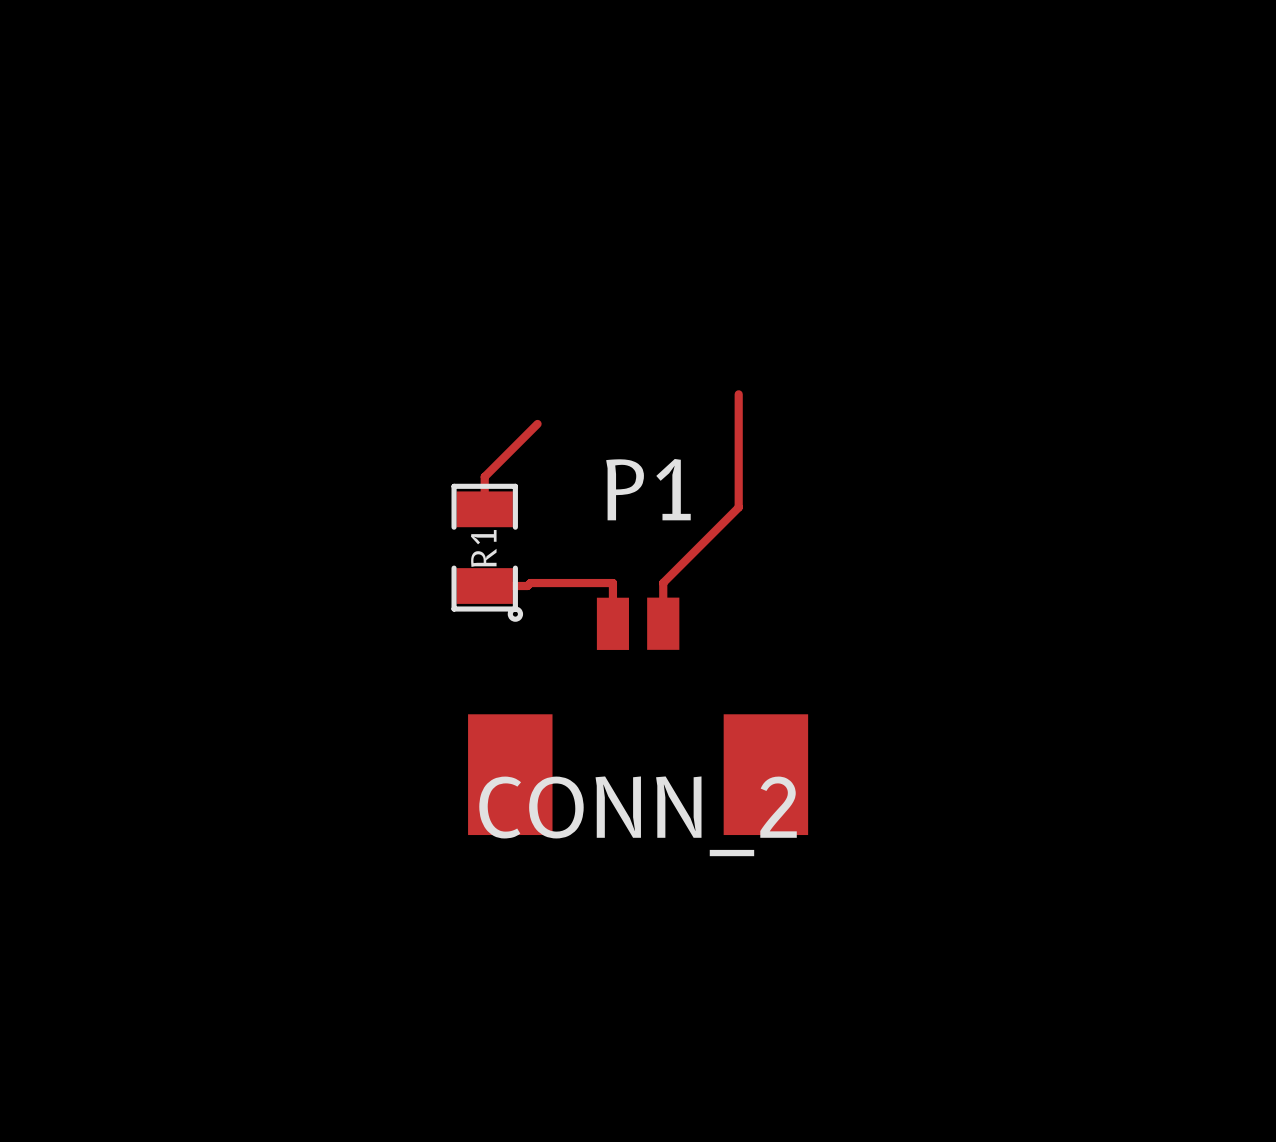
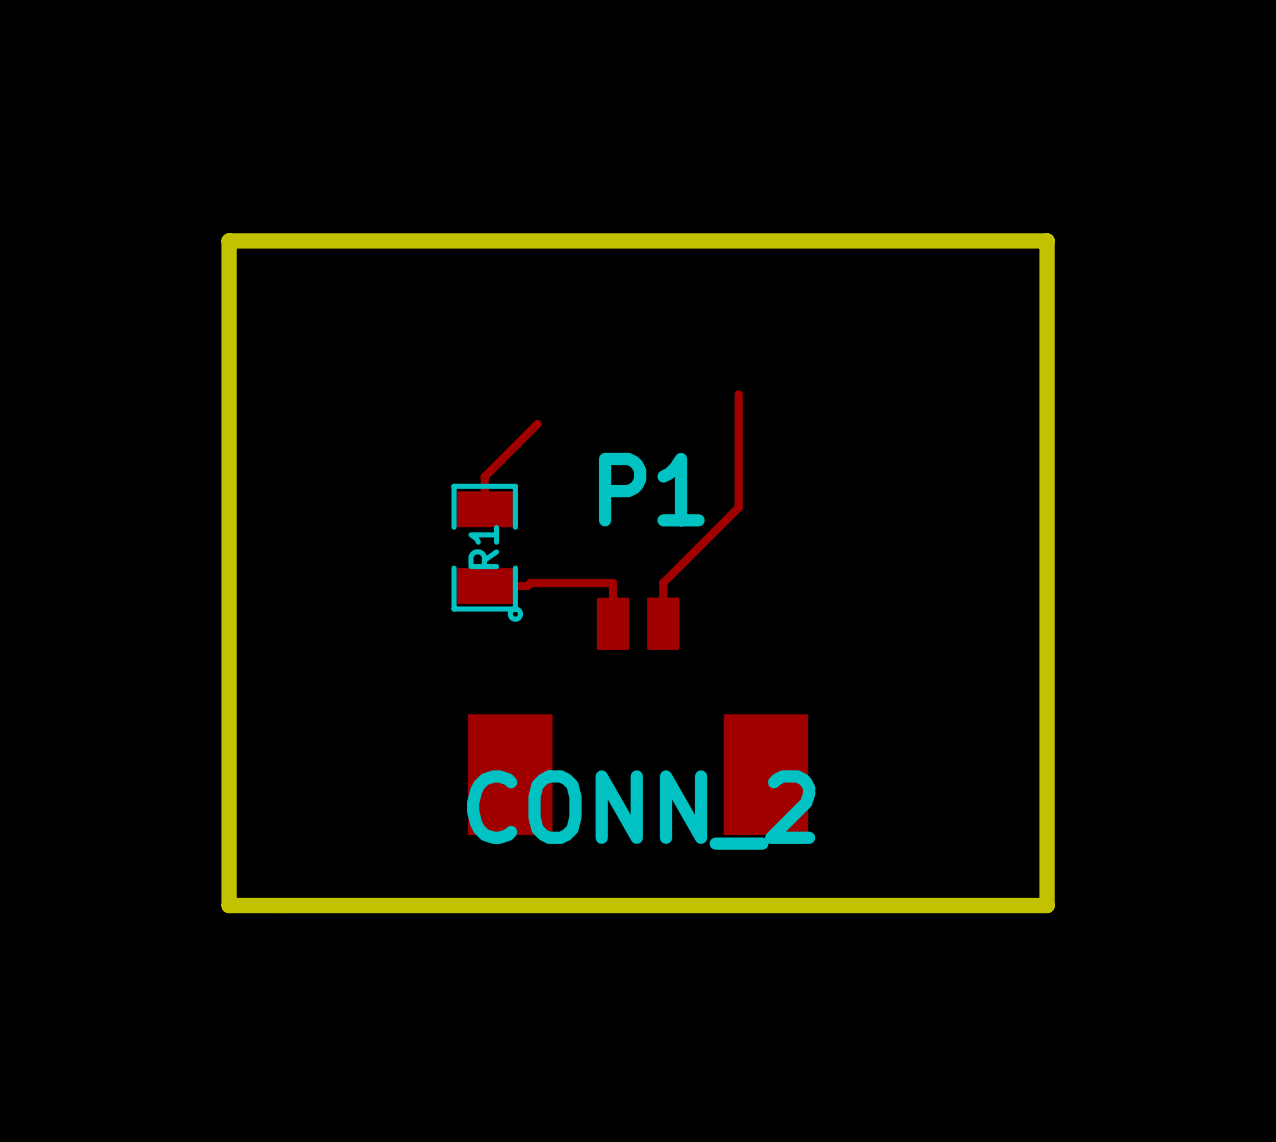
board edge: none -> (229, 240) (1047, 240) (1047, 905) (229, 905) (229, 240)

